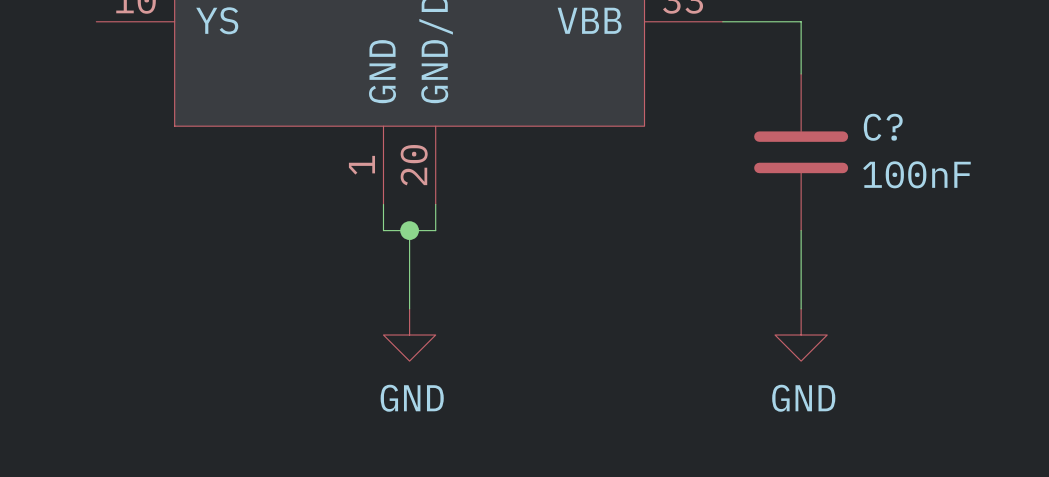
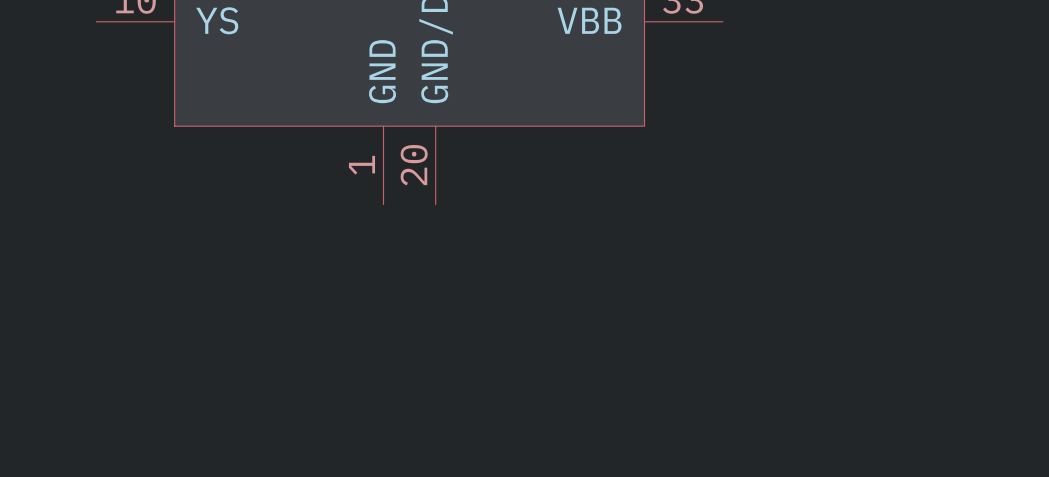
wire: (722, 21) (801, 21) (801, 73) -> none
C?: 100nF (801, 152) -> none
wire: (383, 204) (383, 230) (435, 230) (435, 204) -> none
wire: (409, 230) (409, 308) -> none
junction: (409, 230) -> none
wire: (801, 230) (801, 308) -> none
power symbol: GND (409, 335) -> none
power symbol: GND (801, 335) -> none

